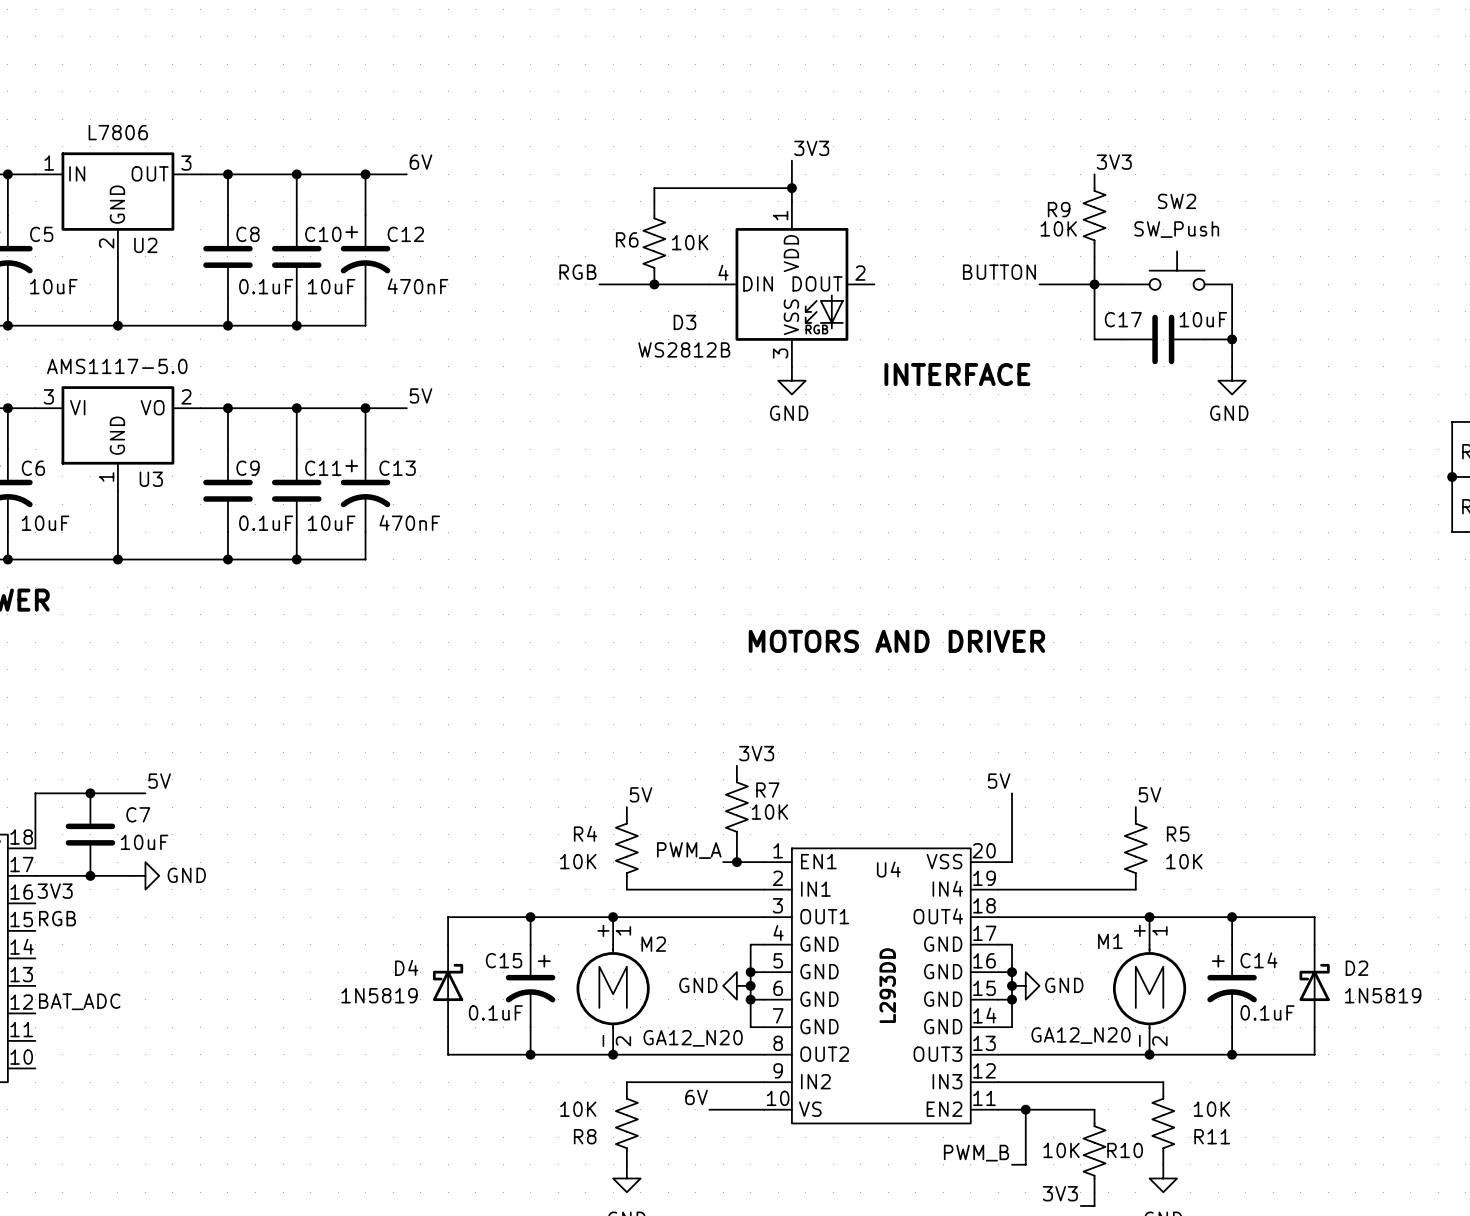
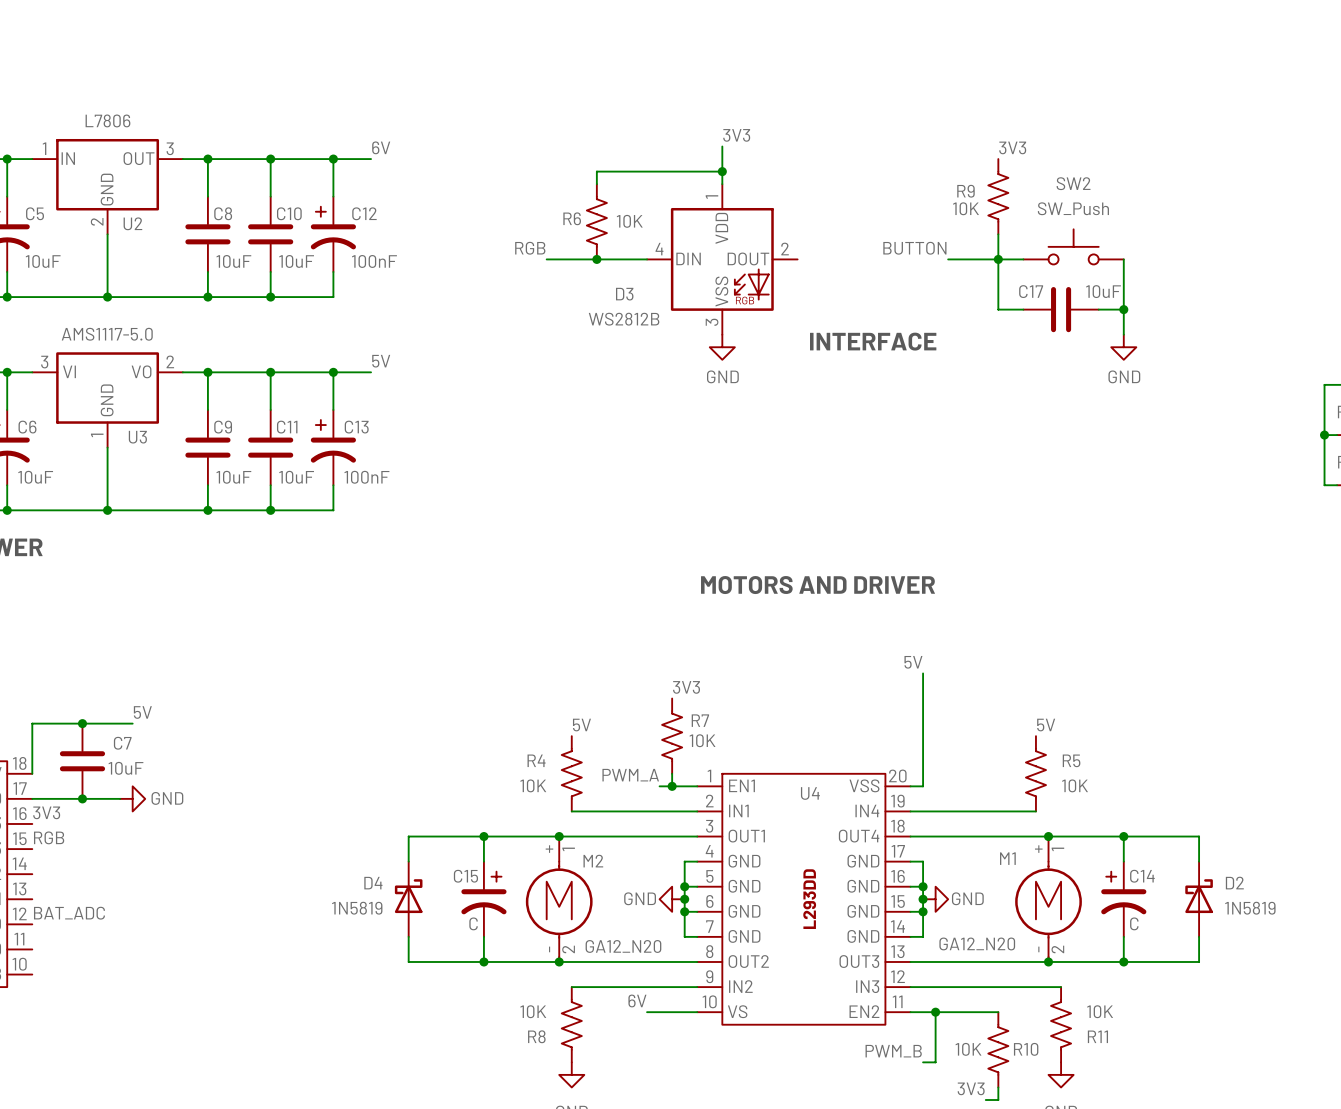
C8 value: 0.1uF (266, 286) -> 10uF (233, 261)
C12 value: 470nF (417, 286) -> 100nF (374, 261)
C13 value: 470nF (409, 522) -> 100nF (366, 477)
C9 value: 0.1uF (266, 523) -> 10uF (233, 477)
wire: none -> (923, 673) (923, 723)
label position: 5V (999, 781) -> 5V (913, 662)
C15 value: 0.1uF (495, 1012) -> C (473, 923)
C14 value: 0.1uF (1267, 1012) -> C (1134, 923)

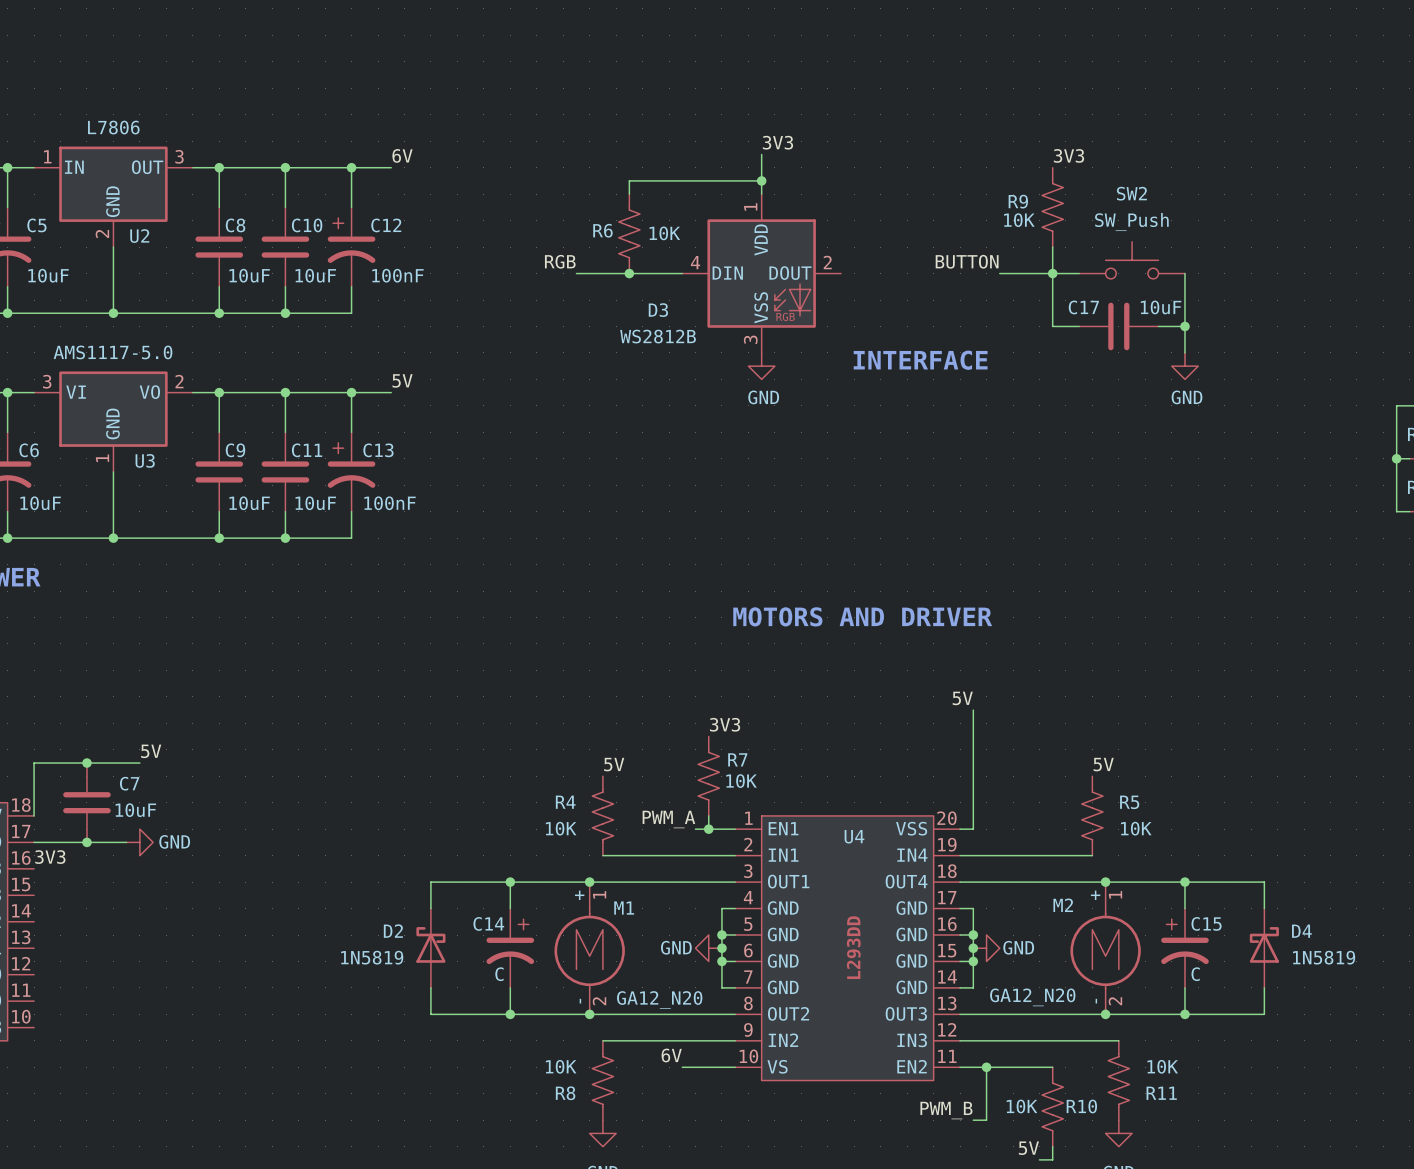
label: RGB (49, 837) -> none
M1 name: M1 (1007, 858) -> M2 (1063, 905)
M2 name: M2 (593, 861) -> M1 (624, 908)
C15 name: C15 (465, 876) -> C14 (488, 923)
C14 name: C14 (1142, 876) -> C15 (1206, 923)
D2 name: D2 (1234, 883) -> D4 (1301, 931)
D4: 1N5819 (408, 899) -> none
D2: none -> 1N5819 (430, 948)
label: BAT_ADC (69, 913) -> none
label: 3V3 (971, 1088) -> 5V (1028, 1148)

